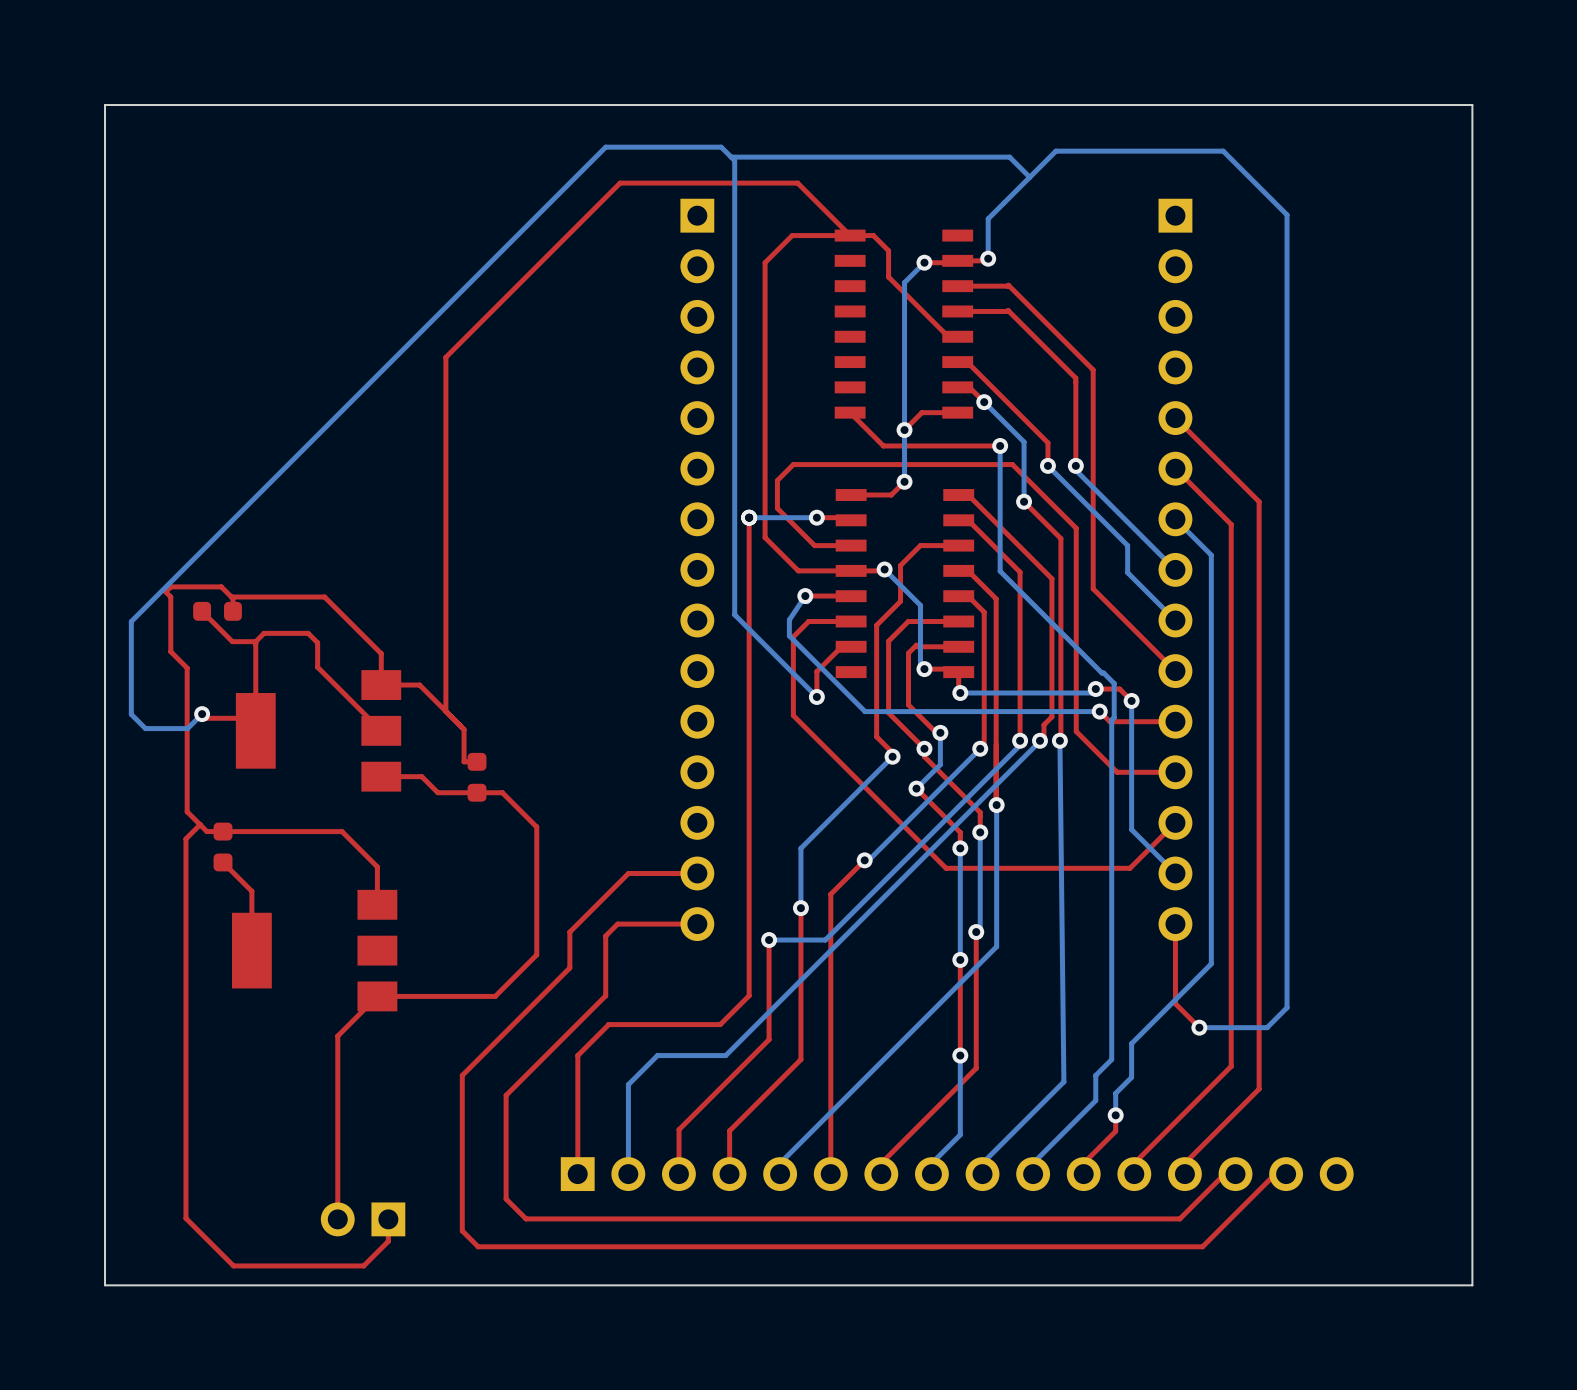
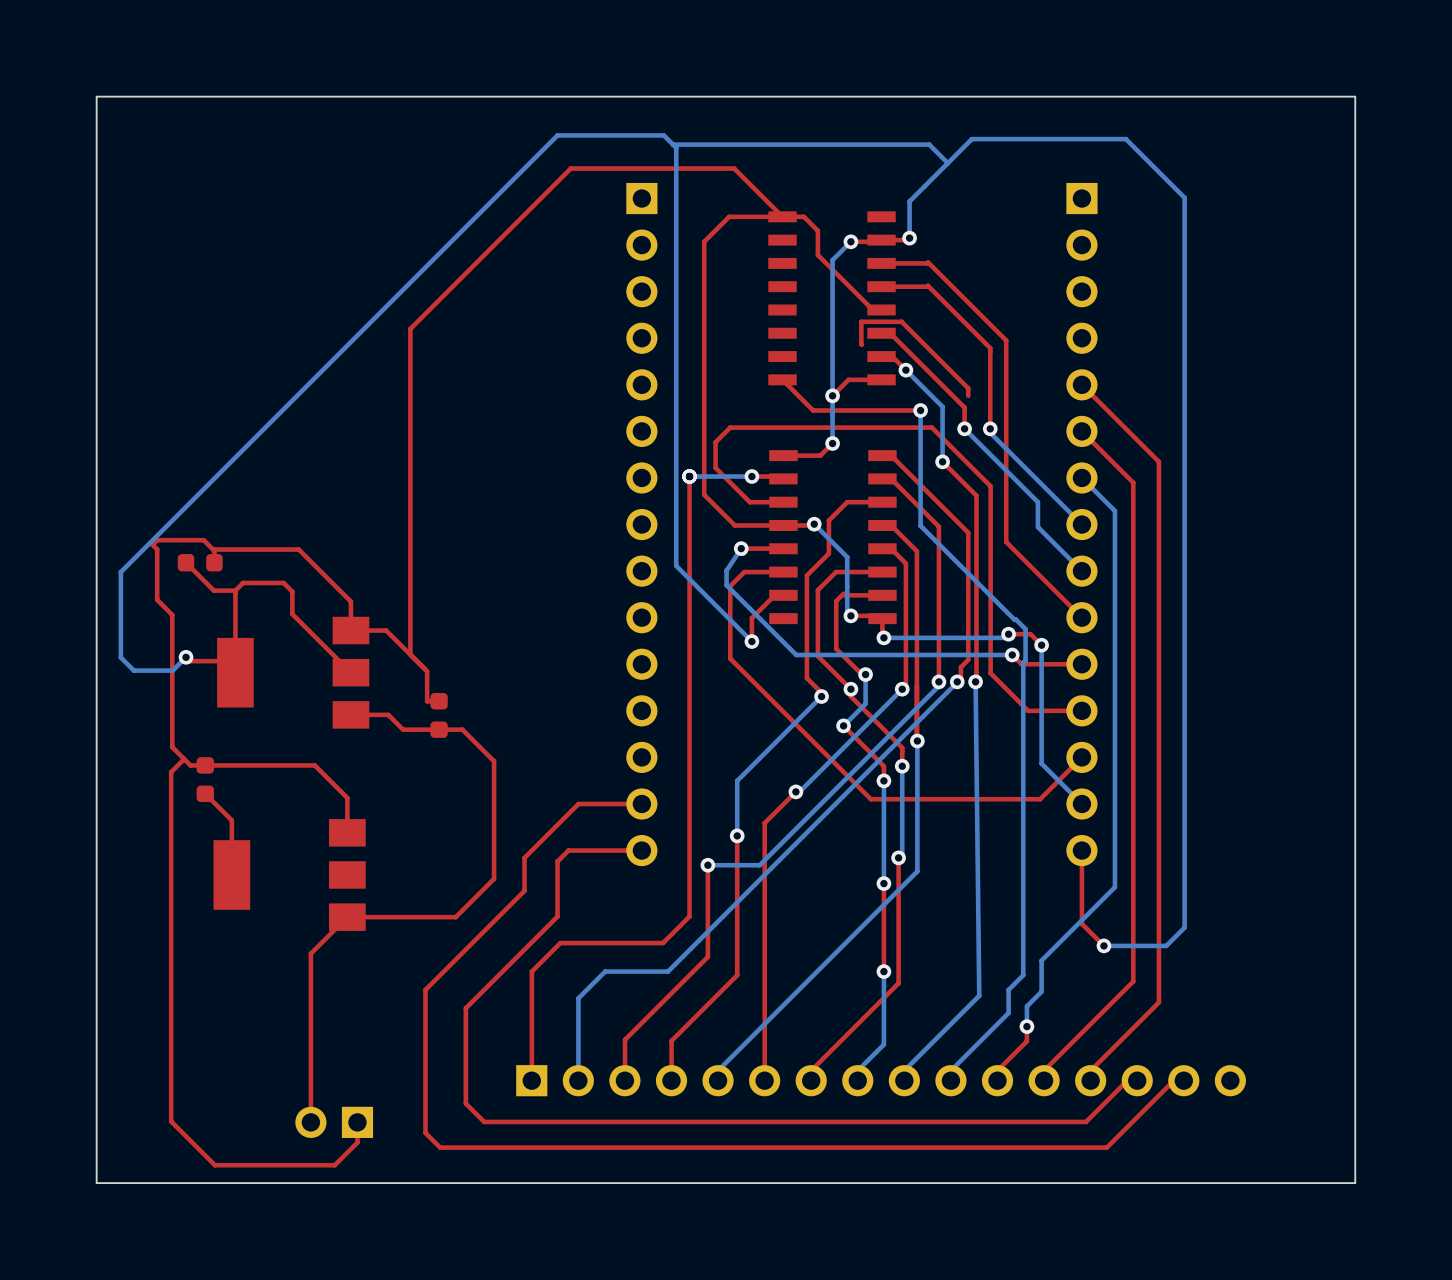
top track: none -> (861, 344) (861, 321) (901, 321) (968, 388) (968, 395)

